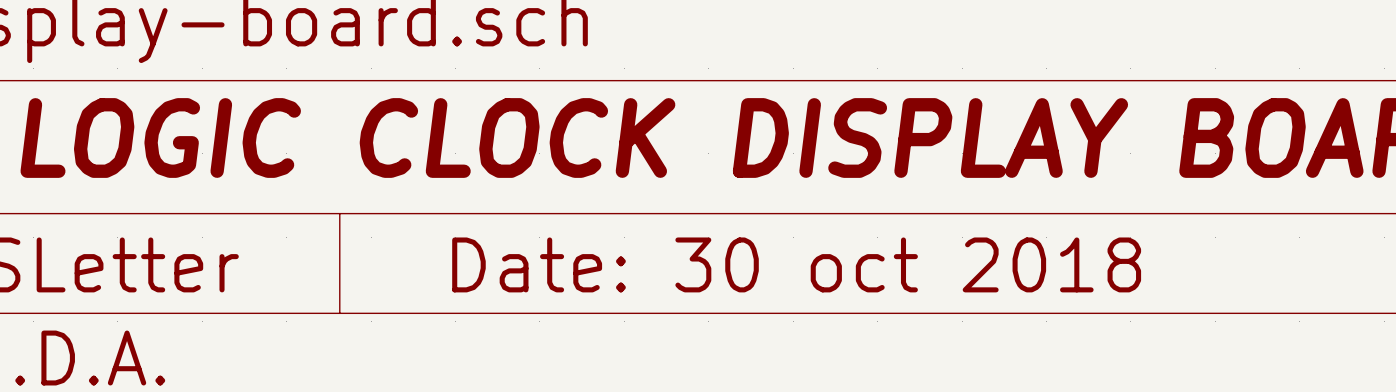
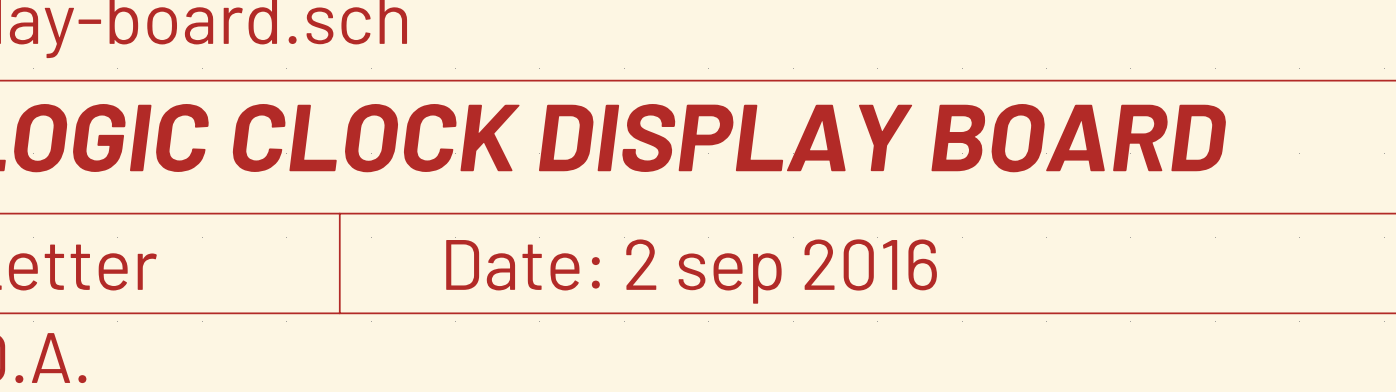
title block: Date: 30 oct 2018 (796, 264) -> Date: 2 sep 2016 (691, 271)

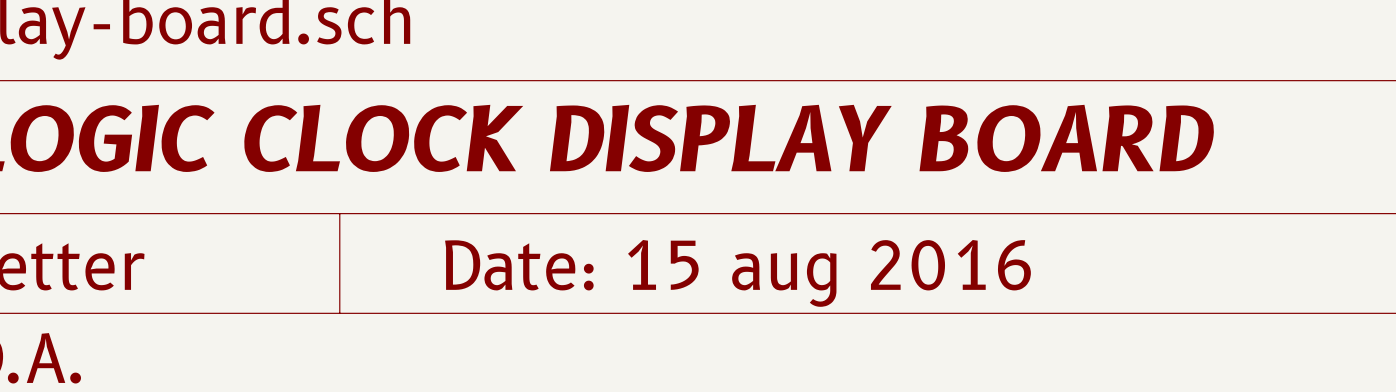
title block: Date: 2 sep 2016 (691, 271) -> Date: 15 aug 2016 (737, 273)

